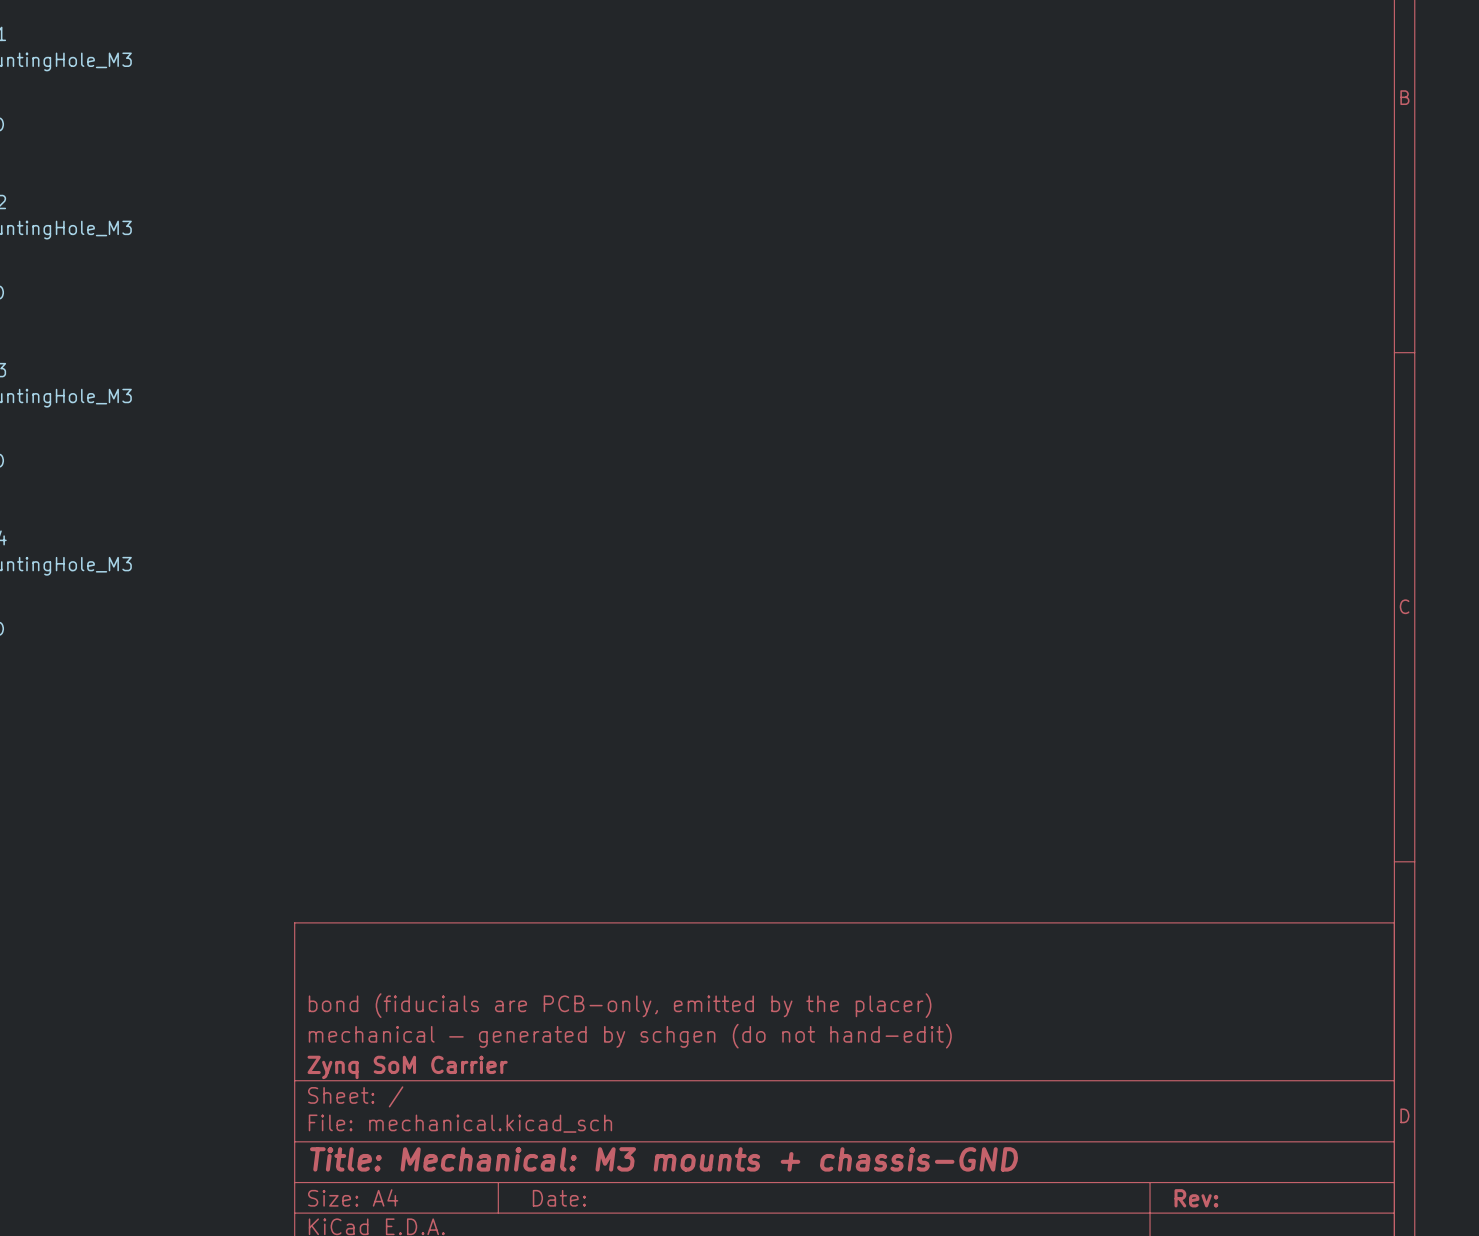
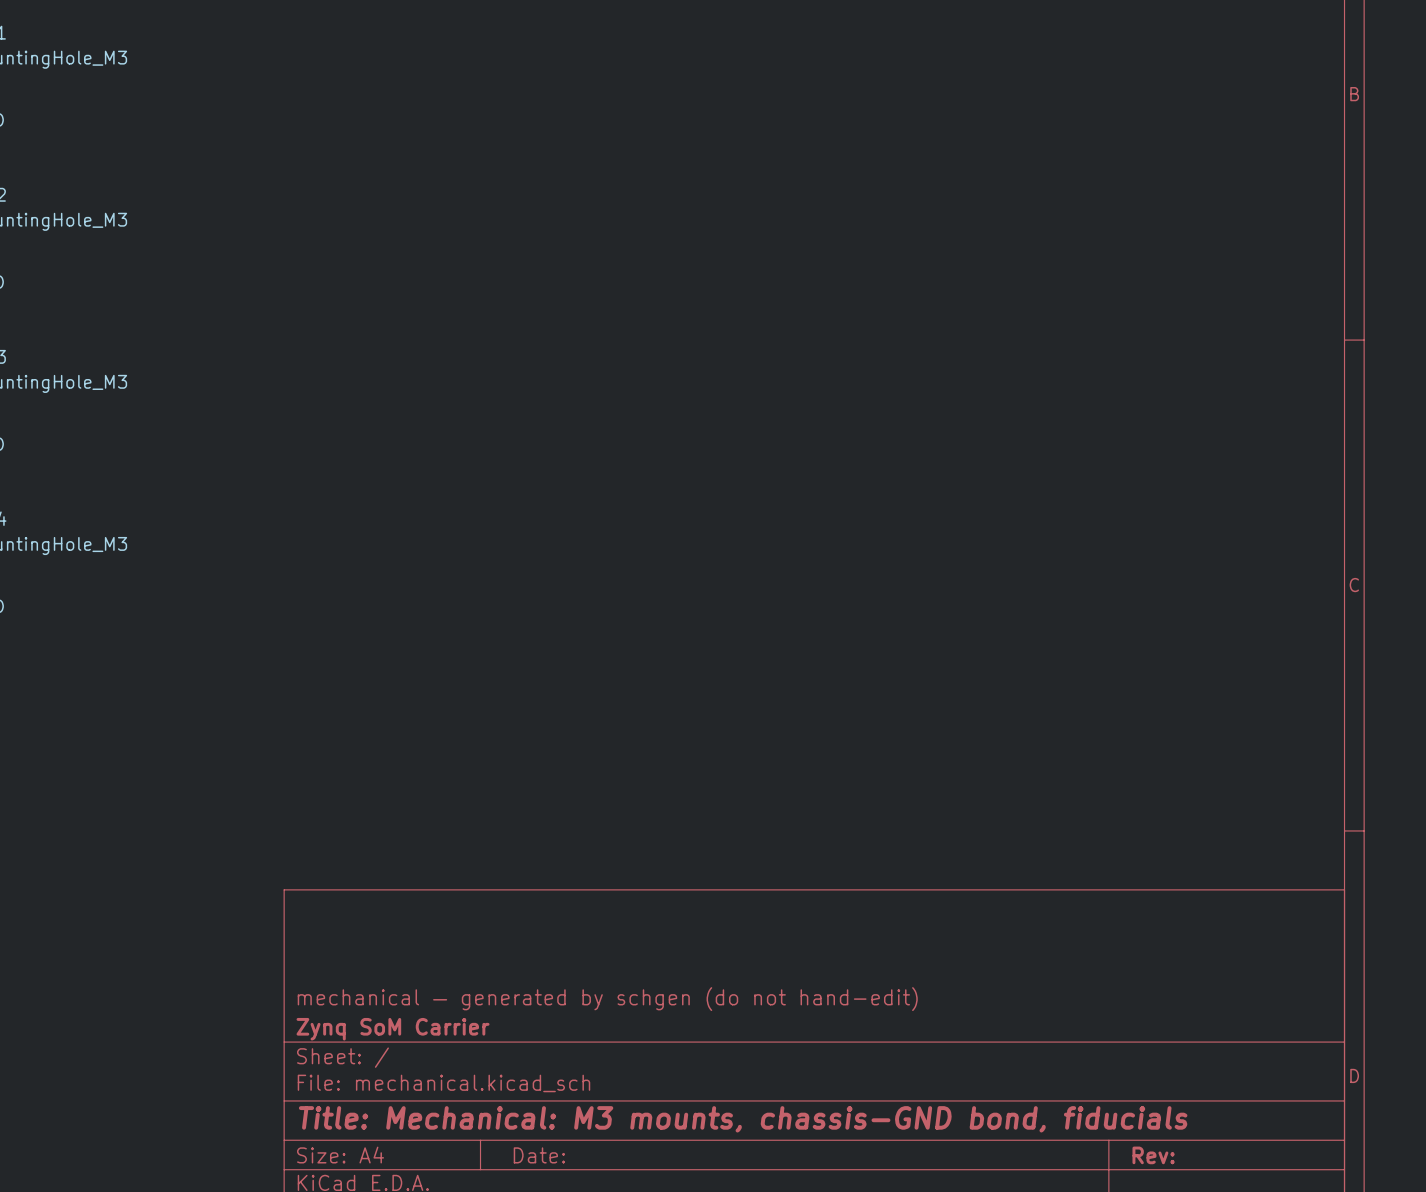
title block: bond (fiducials are PCB-only, emitted by the placer) (620, 1005) -> none
title block: Title: Mechanical: M3 mounts + chassis-GND (664, 1159) -> Title: Mechanical: M3 mounts, chassis-GND bond, fiducials (743, 1119)

